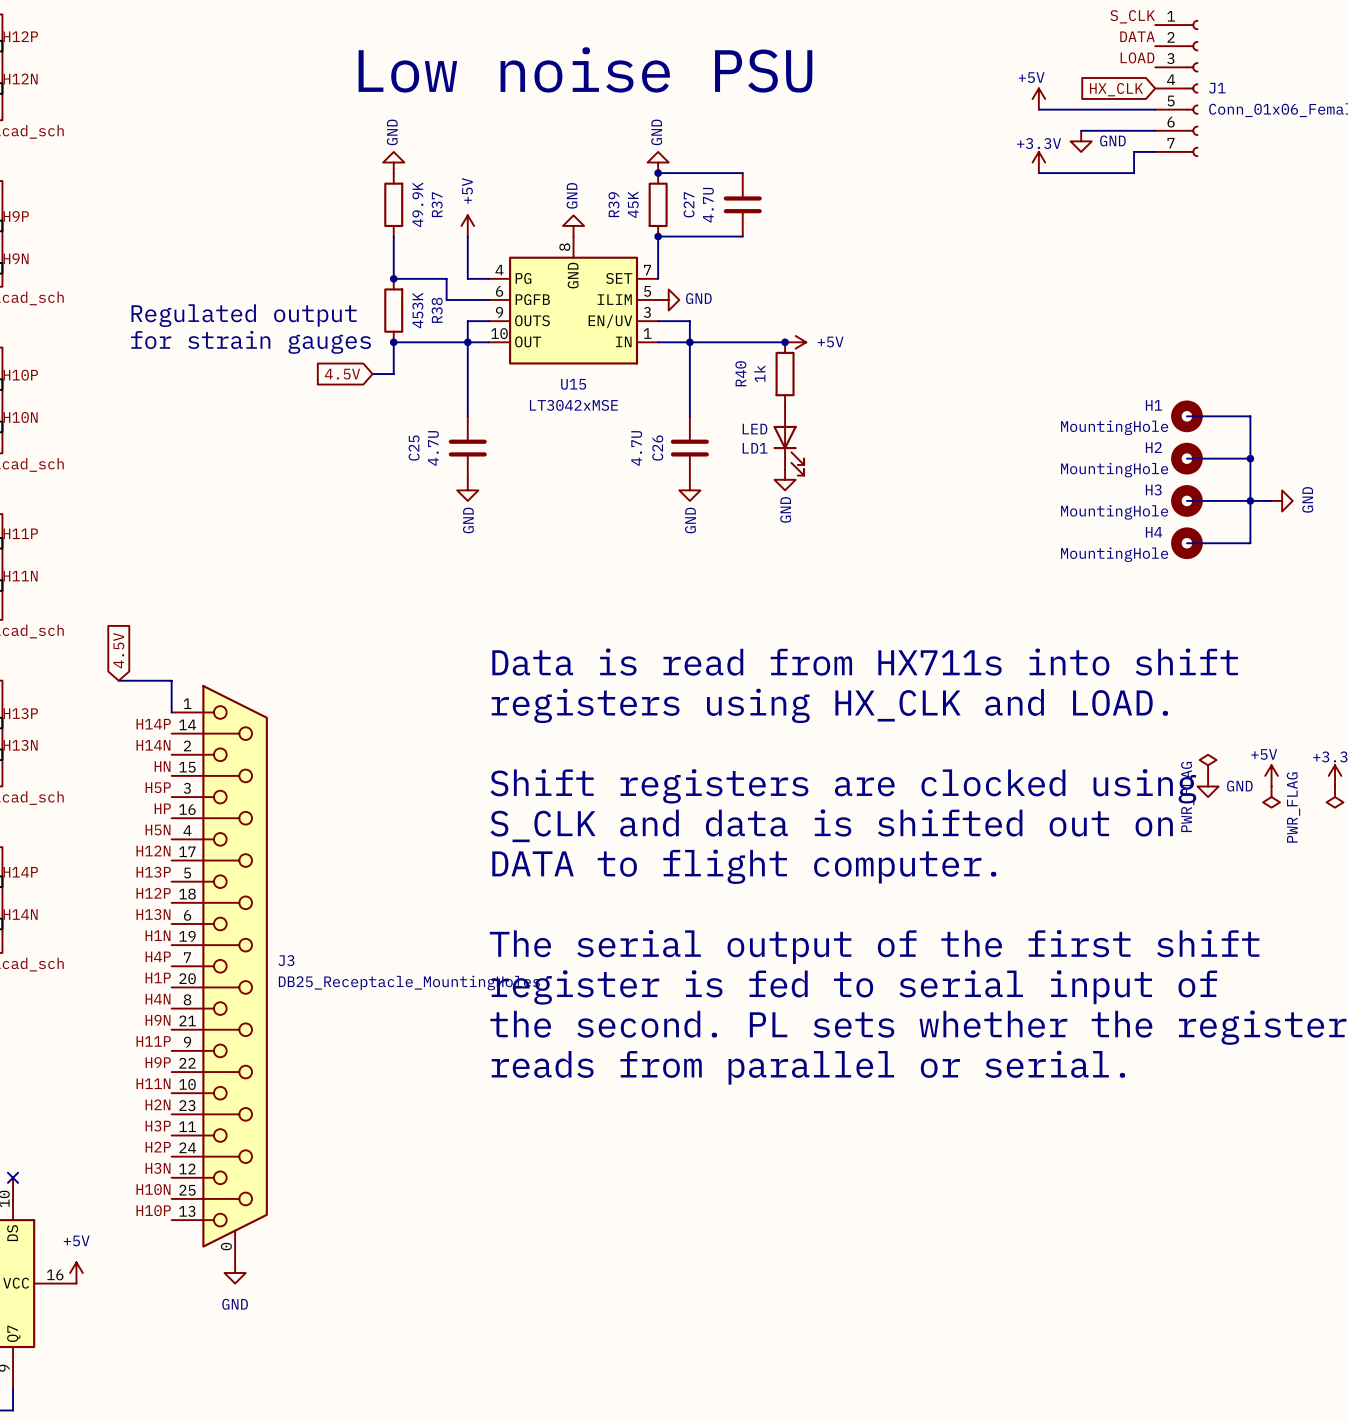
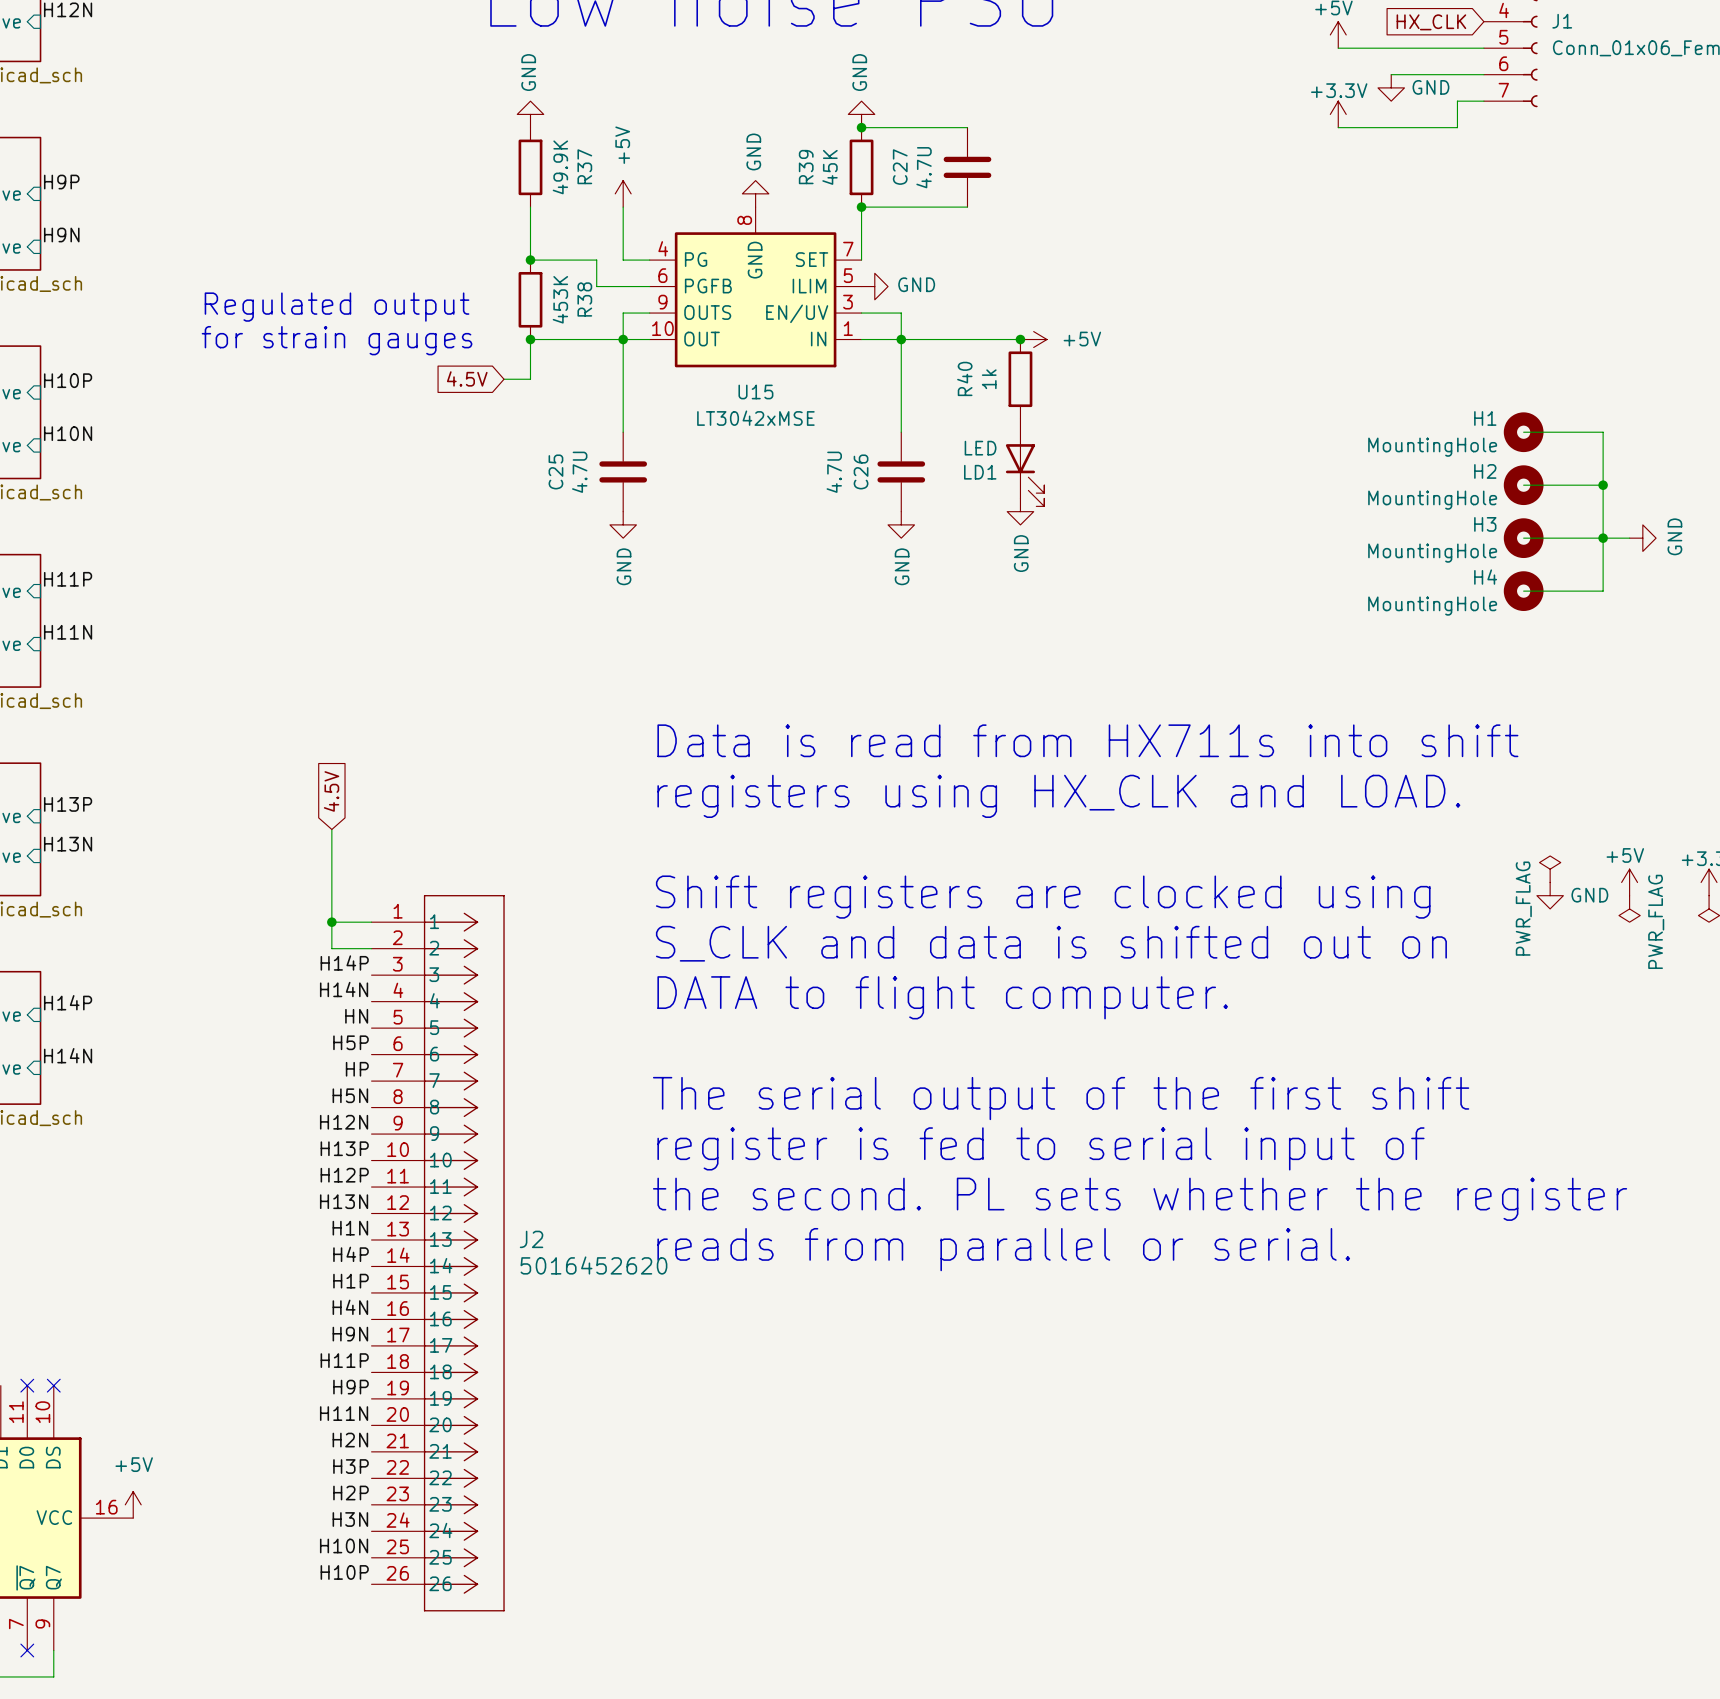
global label position: 4.5V (118, 650) -> 4.5V (331, 791)
wire: (118, 680) (171, 680) (171, 712) -> none
label position: H14P (153, 724) -> H14P (344, 963)
label position: H14N (153, 745) -> H14N (344, 989)
label position: HN (162, 766) -> HN (356, 1016)
label position: H5P (158, 787) -> H5P (350, 1042)
junction: none -> (331, 922)
label position: HP (162, 808) -> HP (357, 1069)
label position: H5N (158, 830) -> H5N (350, 1095)
label position: H12N (153, 851) -> H12N (344, 1122)
label position: H13P (153, 872) -> H13P (344, 1148)
label position: H12P (153, 893) -> H12P (344, 1175)
label position: H13N (153, 914) -> H13N (344, 1201)
label position: H1N (158, 935) -> H1N (350, 1228)
label position: H4P (158, 956) -> H4P (350, 1254)
J3: DB25_Receptacle_MountingHoles (219, 973) -> none
label position: H1P (158, 978) -> H1P (350, 1281)
label position: H4N (158, 999) -> H4N (350, 1307)
label position: H9N (158, 1020) -> H9N (350, 1334)
label position: H11P (153, 1041) -> H11P (344, 1360)
label position: H9P (158, 1062) -> H9P (350, 1387)
J2: none -> 5016452620 (438, 1253)
label position: H11N (153, 1083) -> H11N (344, 1413)
label position: H2N (158, 1104) -> H2N (350, 1440)
label position: H3P (158, 1126) -> H3P (350, 1466)
label position: H2P (158, 1147) -> H2P (350, 1493)
label position: H3N (158, 1168) -> H3N (350, 1519)
label position: H10N (153, 1189) -> H10N (344, 1545)
label position: H10P (153, 1210) -> H10P (344, 1572)
power symbol: GND (235, 1272) -> none

